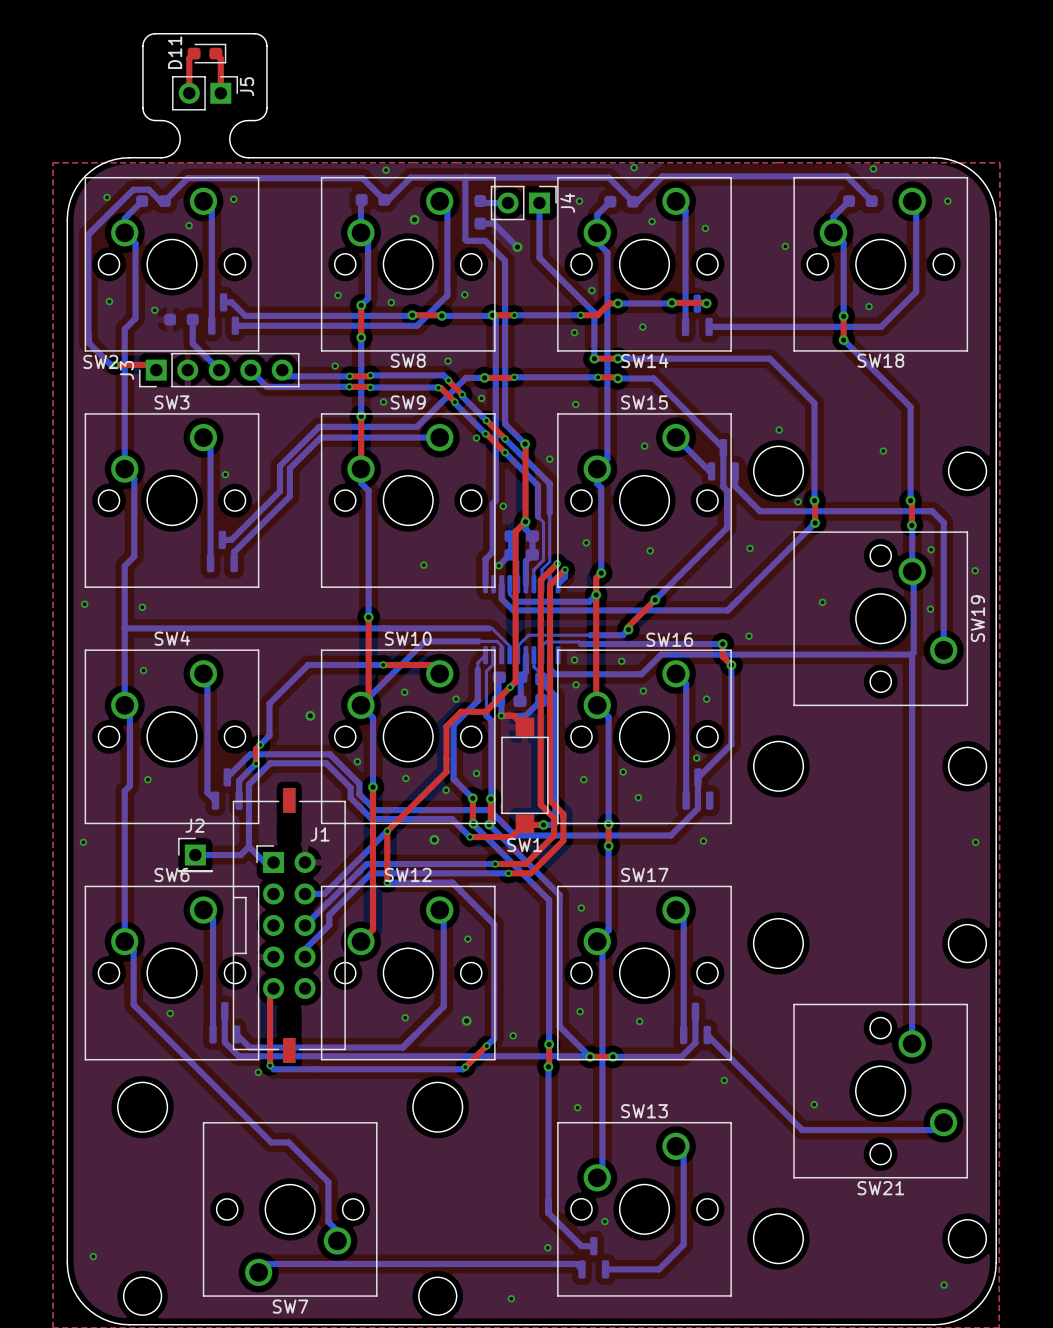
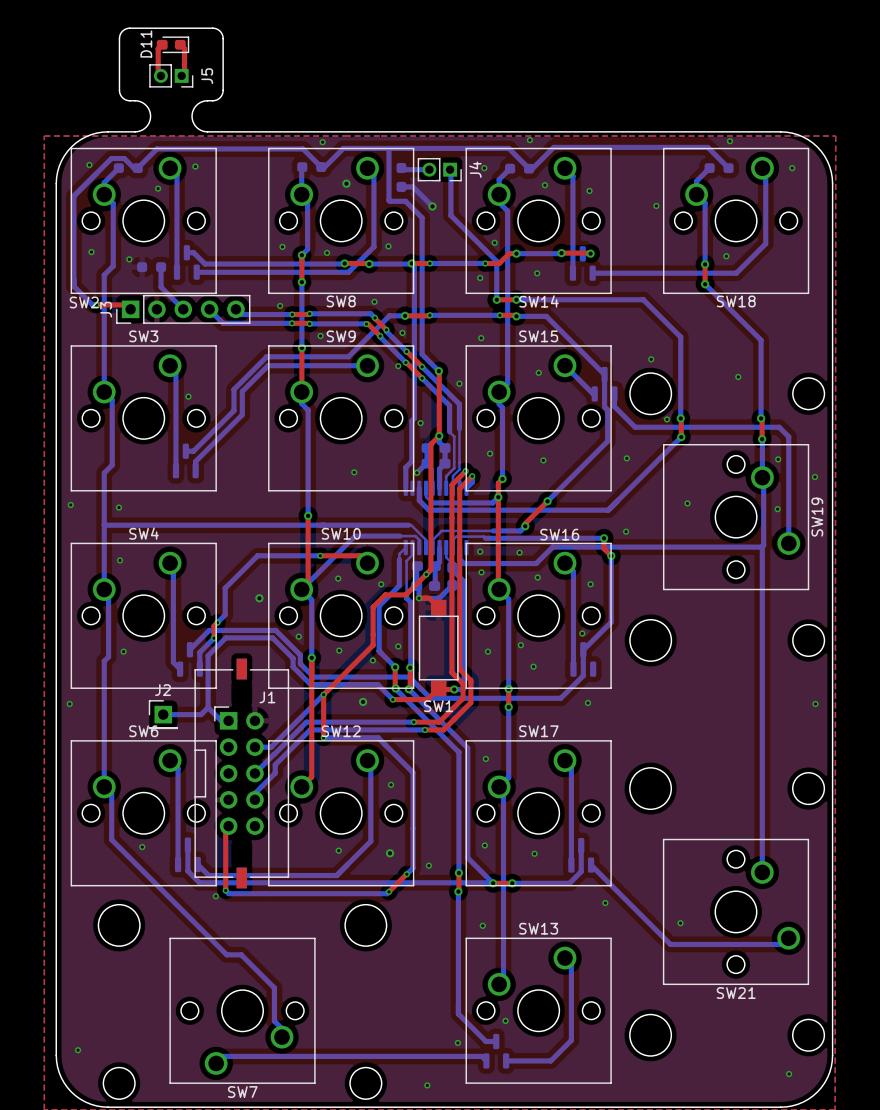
J5 footprint: [172, 76, 239, 111] -> [149, 64, 194, 88]
J4 footprint: [490, 185, 557, 221] -> [417, 158, 462, 182]

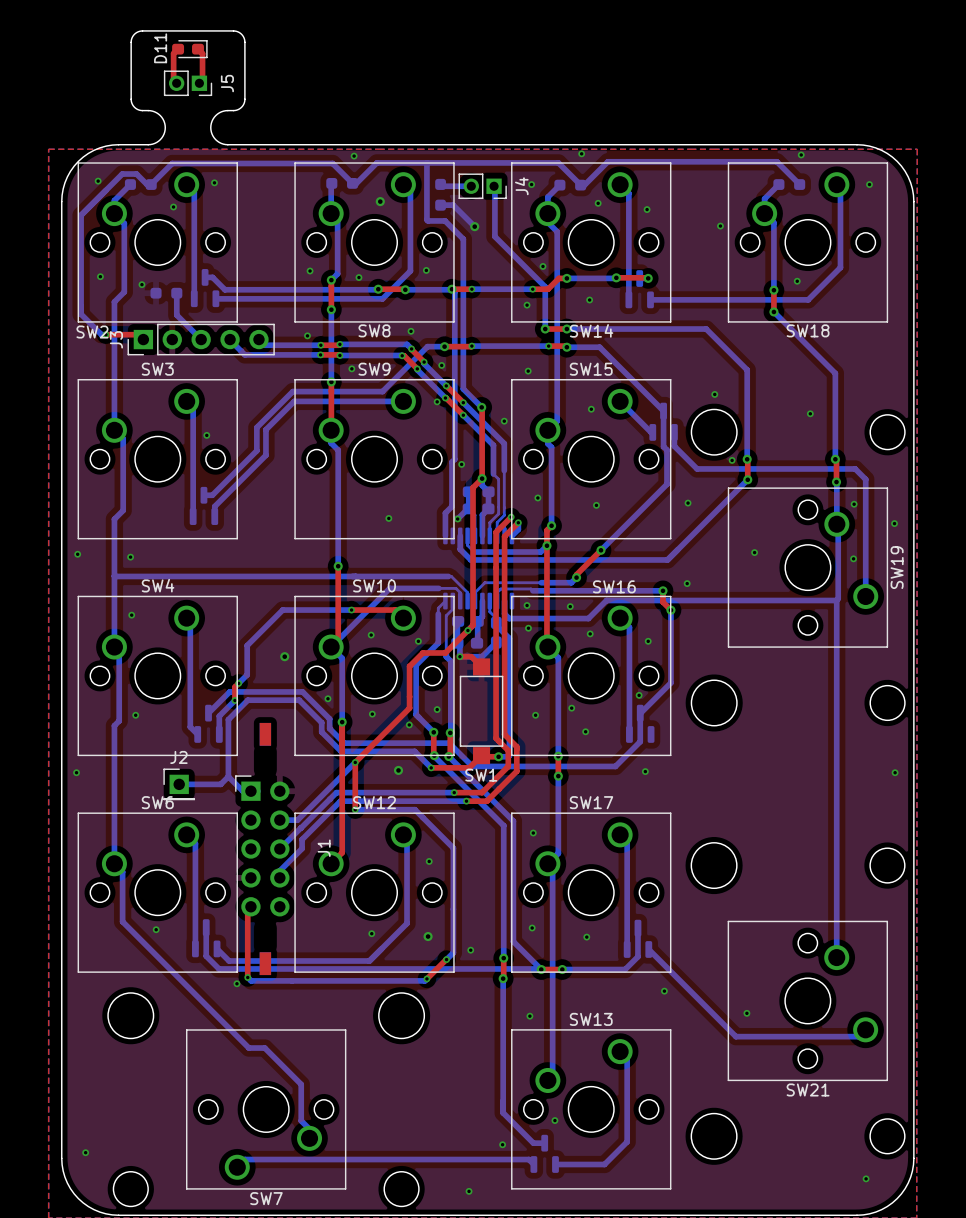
J1 footprint: [194, 658, 290, 889] -> [235, 722, 290, 976]
J1 name position: J1 (267, 697) -> J1 (324, 848)

